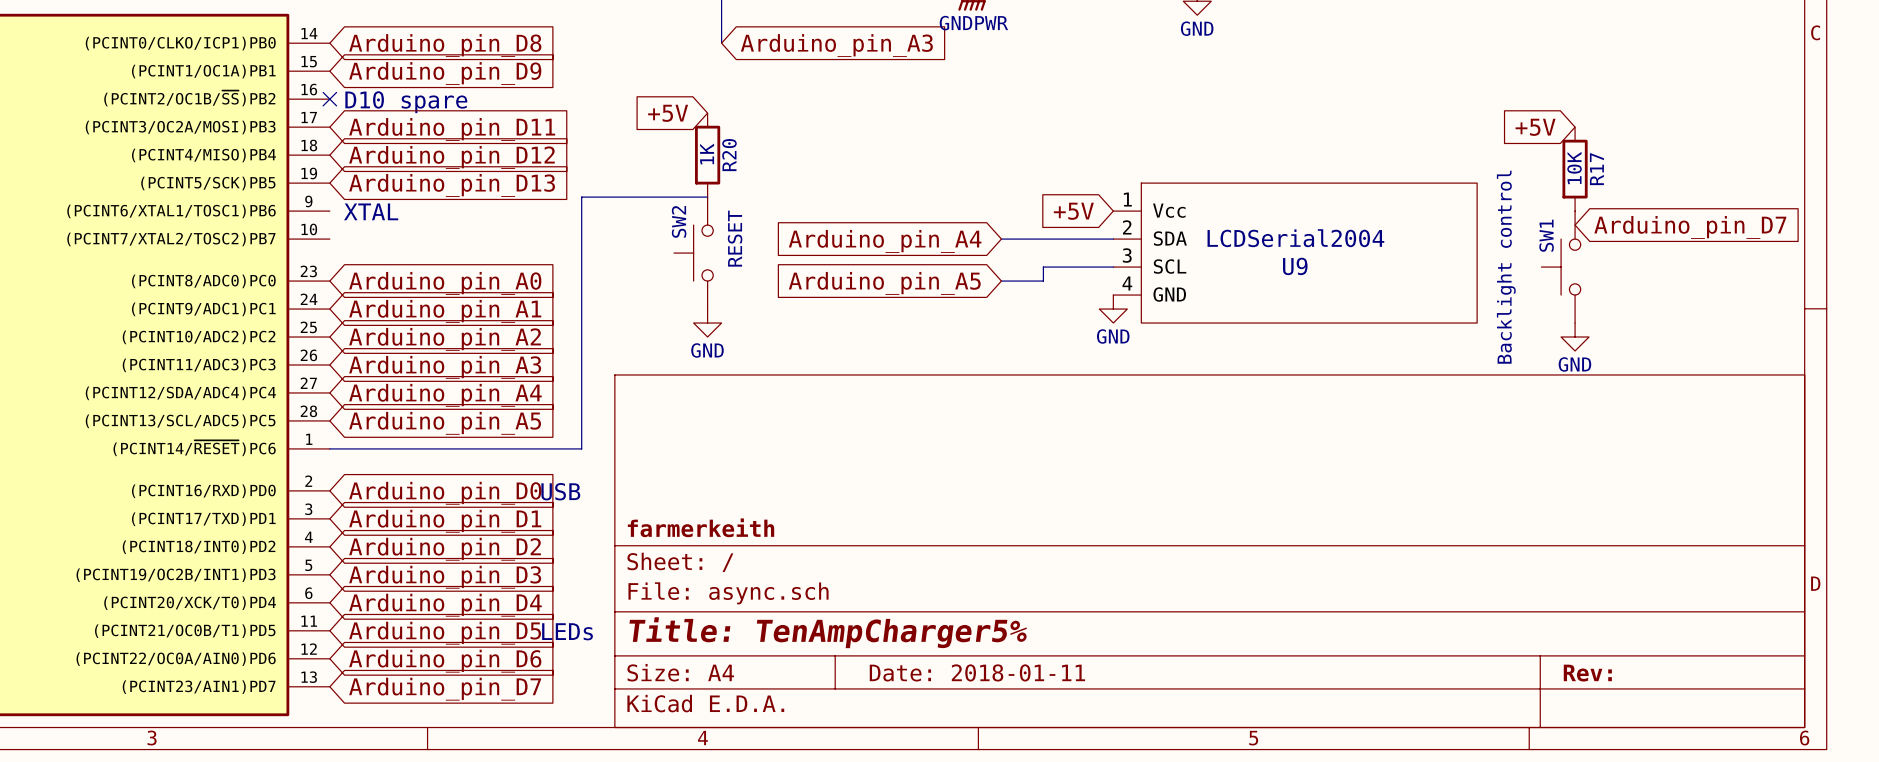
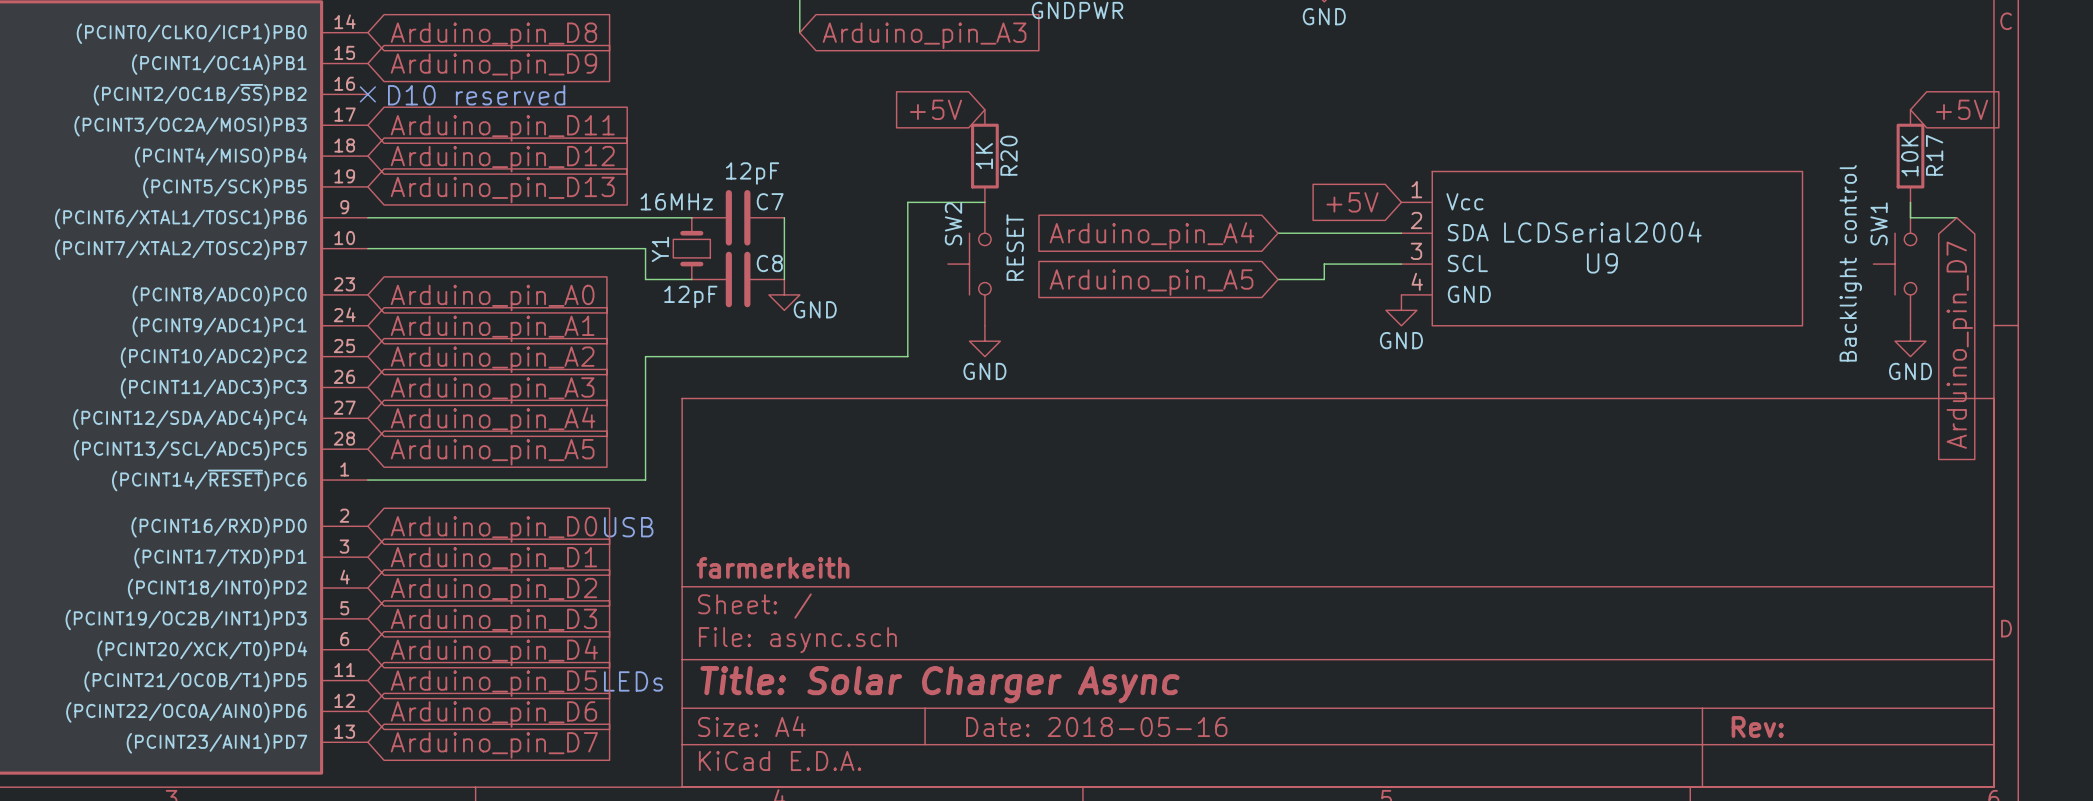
text: D10 spare (406, 102) -> D10 reserved (476, 95)
global label: +5V (668, 113) -> none
global label: none -> +5V (935, 109)
global label rotation: 0° (1535, 127) -> 180° (1962, 109)
global label position: +5V (1535, 127) -> +5V (1962, 109)
R20 position: (707, 155) -> (984, 156)
R17 position: (1575, 169) -> (1910, 156)
wire: (707, 197) (581, 197) (581, 239) -> (367, 248) (645, 248)
wire: none -> (984, 202) (907, 202) (907, 356) (645, 356)
global label: none -> +5V (1352, 202)
wire: none -> (1910, 202) (1910, 217) (1956, 217)
wire: none -> (367, 217) (691, 217)
text: XTAL (371, 211) -> none
C7: none -> 12pF (738, 217)
wire: none -> (784, 217) (784, 279)
global label: +5V (1073, 211) -> none
global label rotation: 0° (1690, 227) -> 90° clockwise (1959, 345)
Y1: none -> 16MHz (691, 248)
wire: (1001, 239) (1113, 239) -> (1278, 233) (1401, 233)
global label position: Arduino_pin_A4 (885, 241) -> Arduino_pin_A4 (1151, 235)
SW2 position: (693, 253) -> (969, 264)
U9 position: (1295, 253) -> (1601, 248)
wire: (581, 267) (581, 337) -> (645, 279) (691, 279)
C8: none -> 12pF (738, 279)
wire: (1113, 267) (1043, 267) (1043, 281) (1001, 281) -> (1401, 264) (1324, 264) (1324, 279) (1278, 279)
SW1 value position: Backlight control (1506, 267) -> Backlight control (1850, 263)
SW1 position: (1561, 267) -> (1895, 264)
global label position: Arduino_pin_A5 (884, 283) -> Arduino_pin_A5 (1151, 282)
power symbol: none -> GND (1401, 310)
power symbol: GND (1113, 309) -> none
power symbol position: GND (707, 323) -> GND (784, 294)
power symbol: none -> GND (984, 341)
power symbol position: GND (1575, 337) -> GND (1910, 341)
power symbol text position: GND (707, 350) -> GND (815, 309)
title block: Title: TenAmpCharger5% (828, 632) -> Title: Solar Charger Async (939, 684)
title block: Date: 2018-01-11 (977, 672) -> Date: 2018-05-16 (1096, 726)

